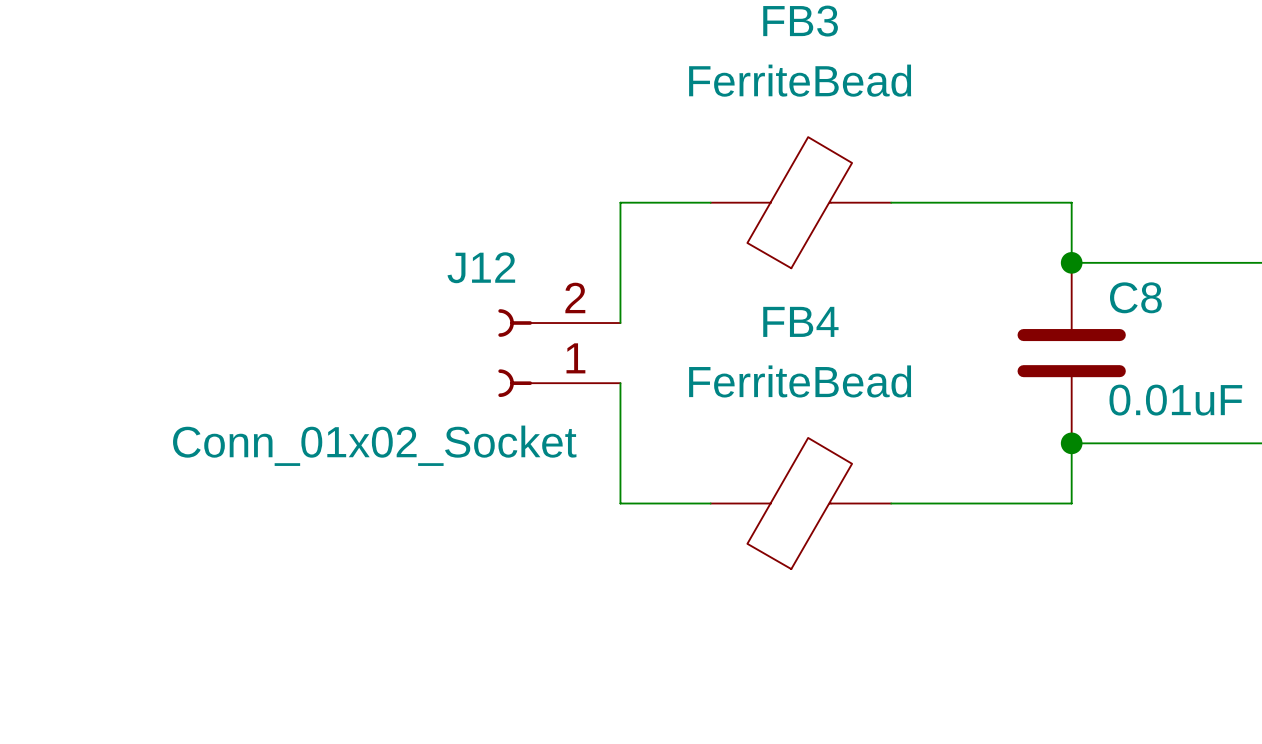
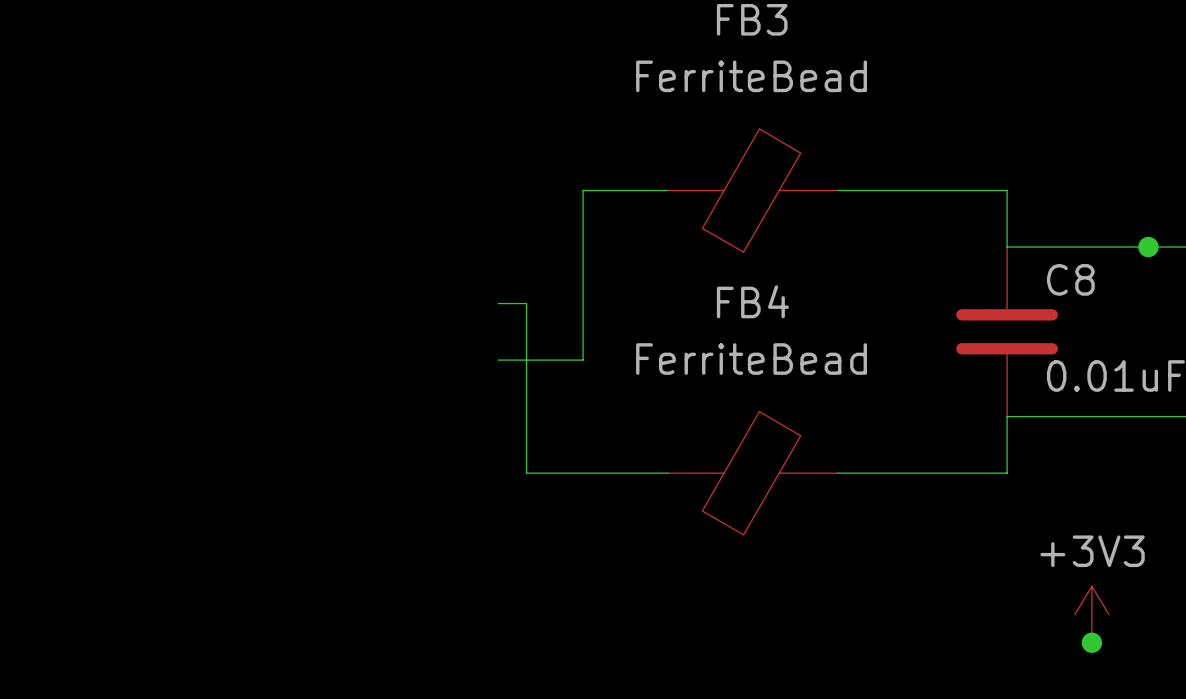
junction: (1071, 262) -> none
junction: none -> (1148, 247)
wire: none -> (583, 303) (583, 360) (498, 360)
J12: Conn_01x02_Socket (559, 353) -> none
wire: (620, 383) (620, 503) -> (498, 303) (526, 303) (526, 473) (583, 473)
junction: (1071, 443) -> none
power symbol: none -> +3V3 (1091, 614)
junction: none -> (1091, 642)

